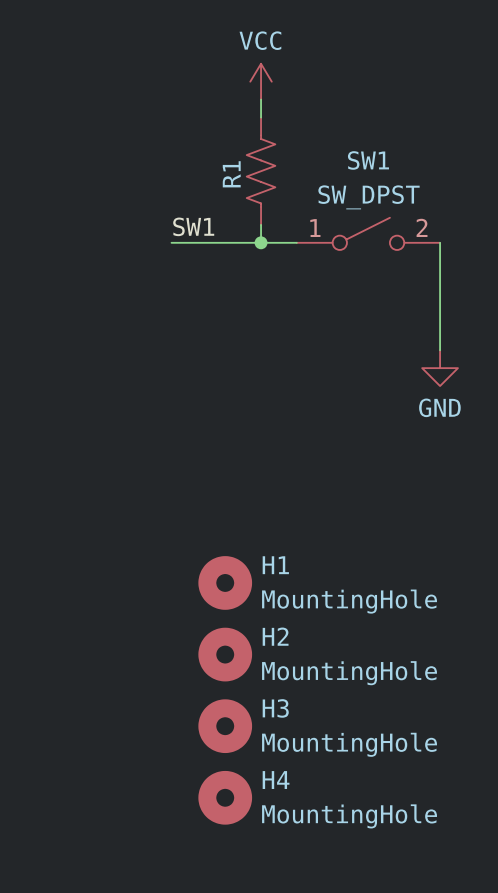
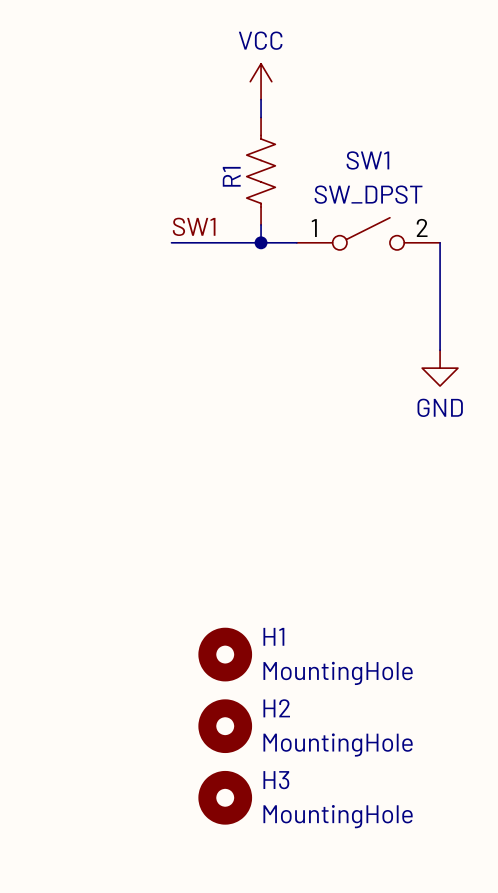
H1: MountingHole (225, 582) -> none
H2 name: H2 (275, 636) -> H1 (273, 636)
H3 name: H3 (275, 708) -> H2 (276, 708)
H4 name: H4 (276, 780) -> H3 (276, 780)

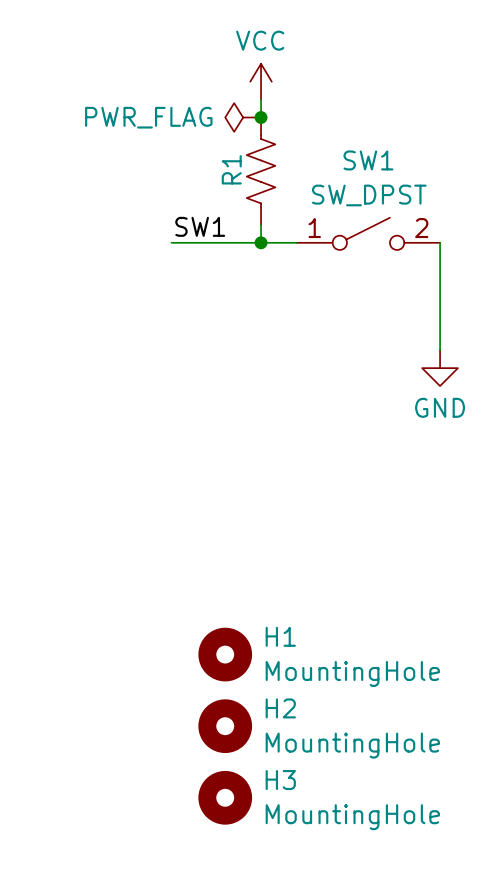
power symbol: none -> PWR_FLAG (243, 117)
junction: none -> (261, 117)

